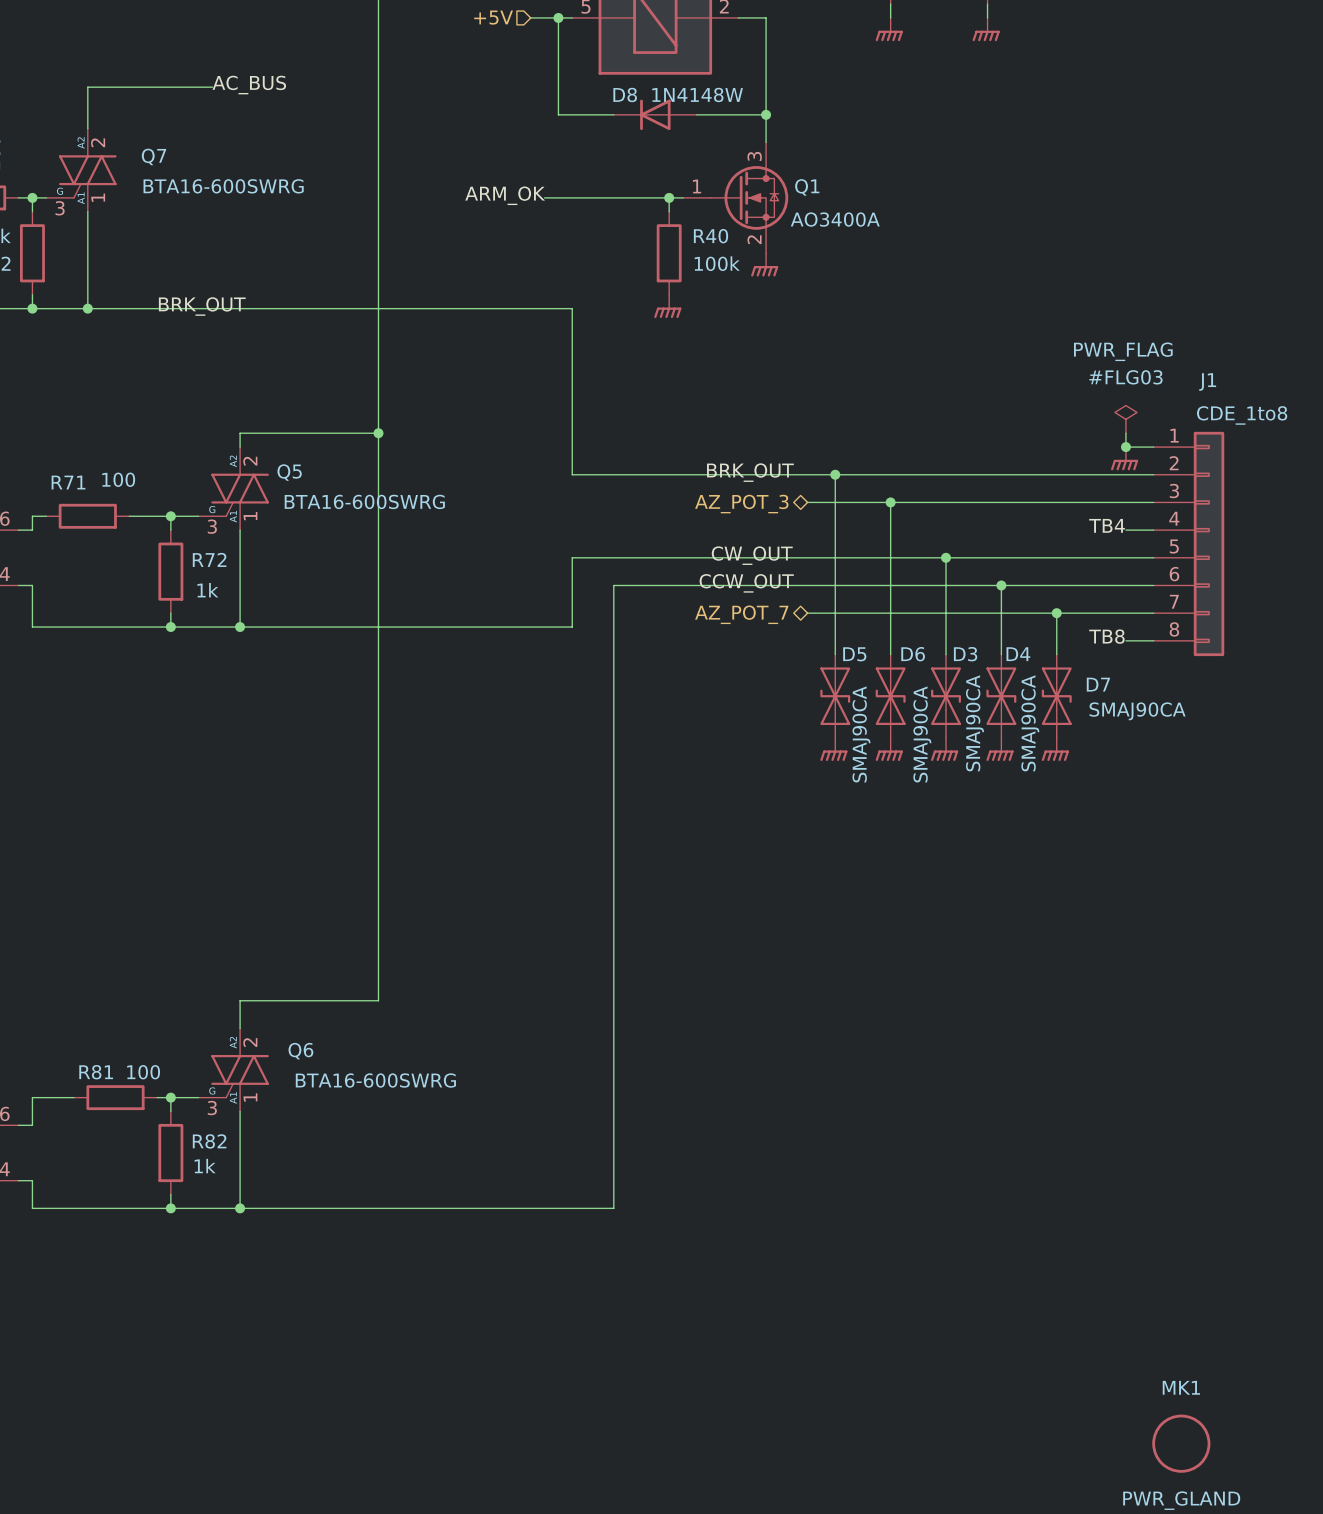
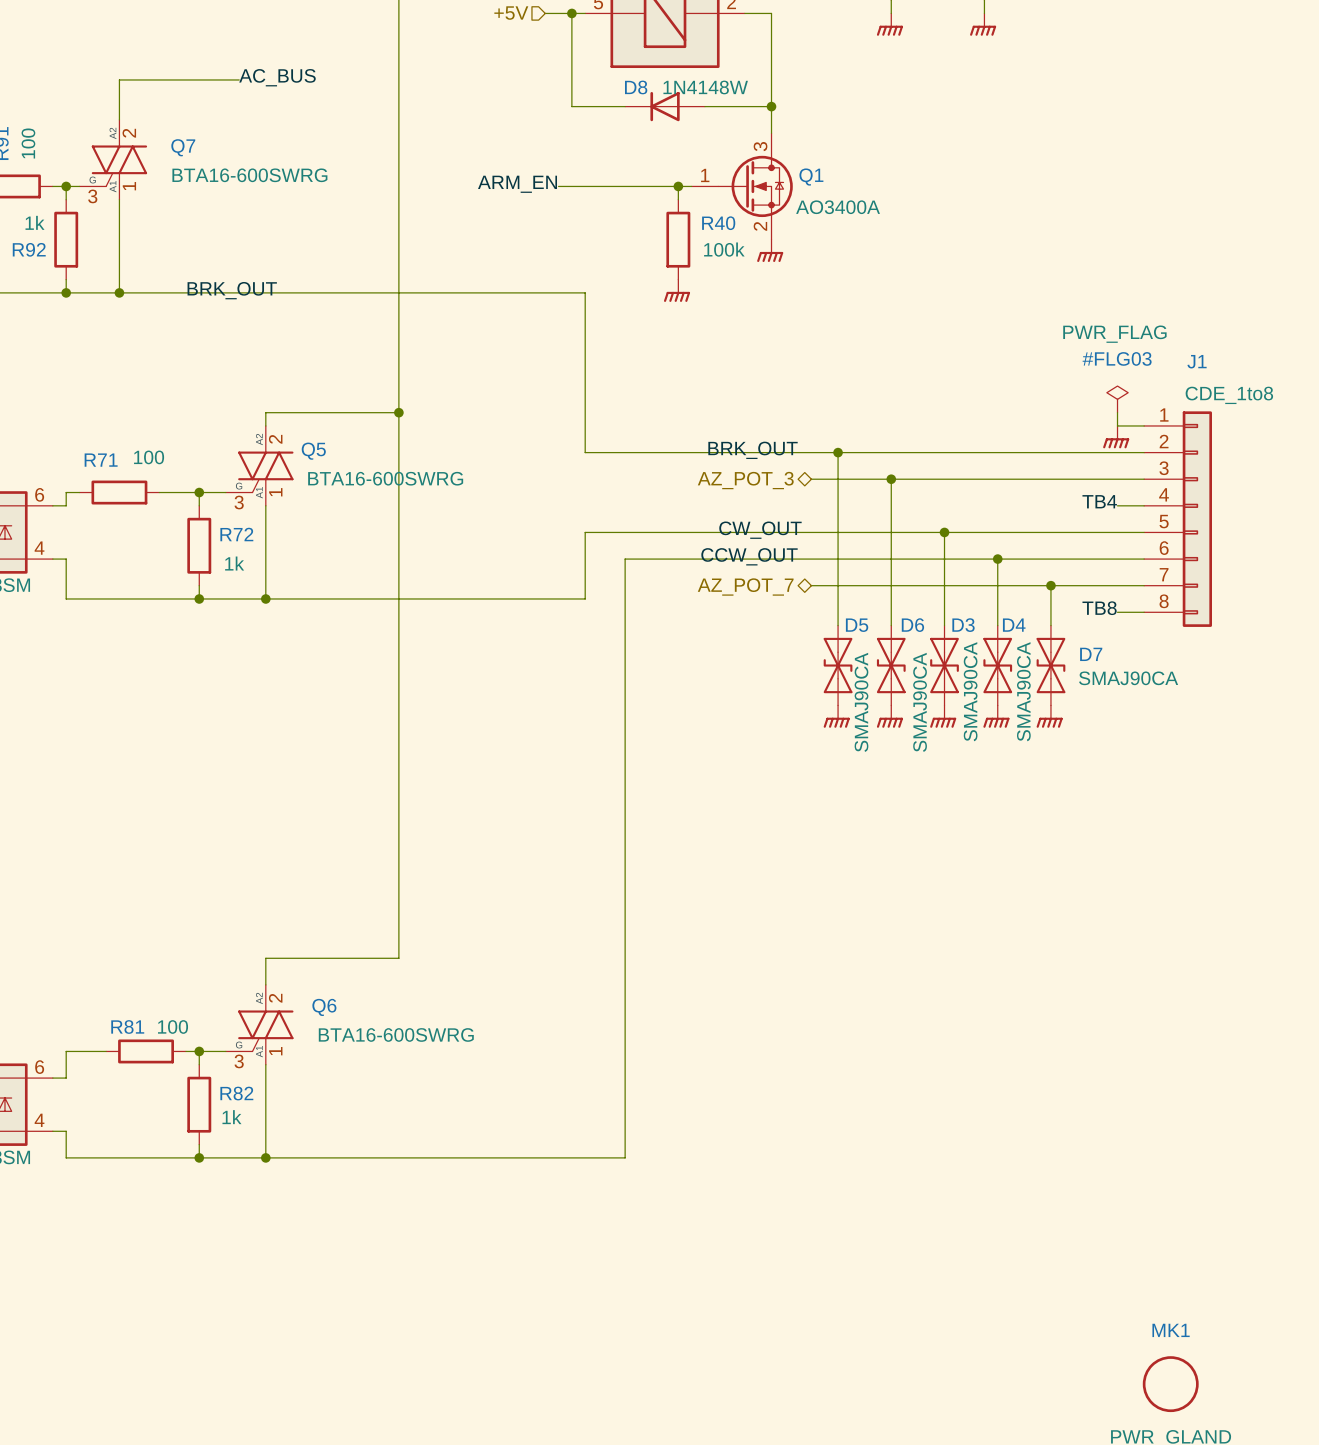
label: ARM_OK (505, 195) -> ARM_EN (517, 184)
junction: (1125, 447) -> none

